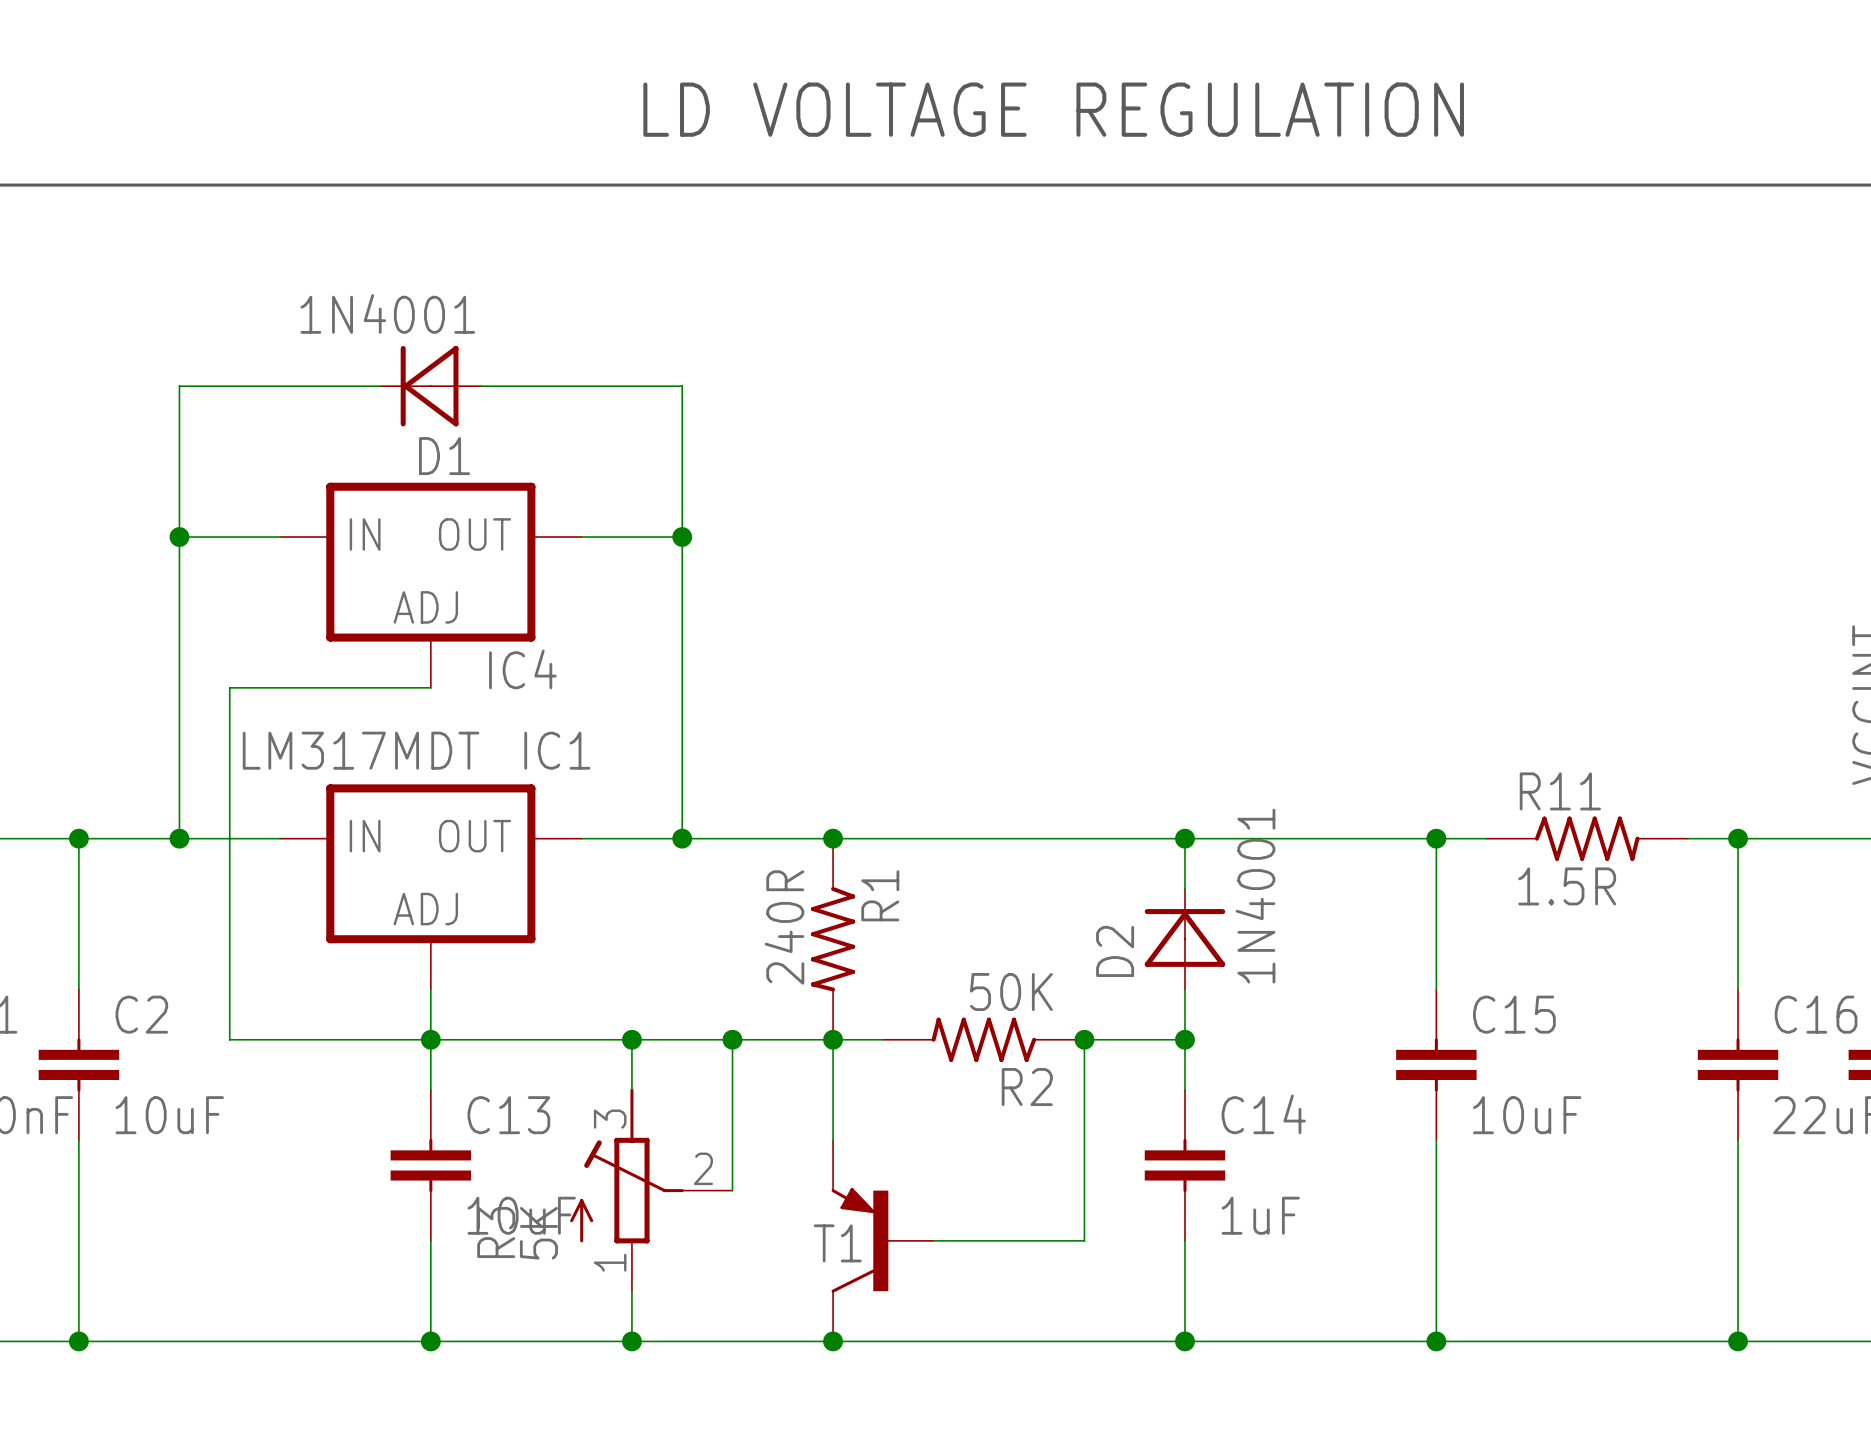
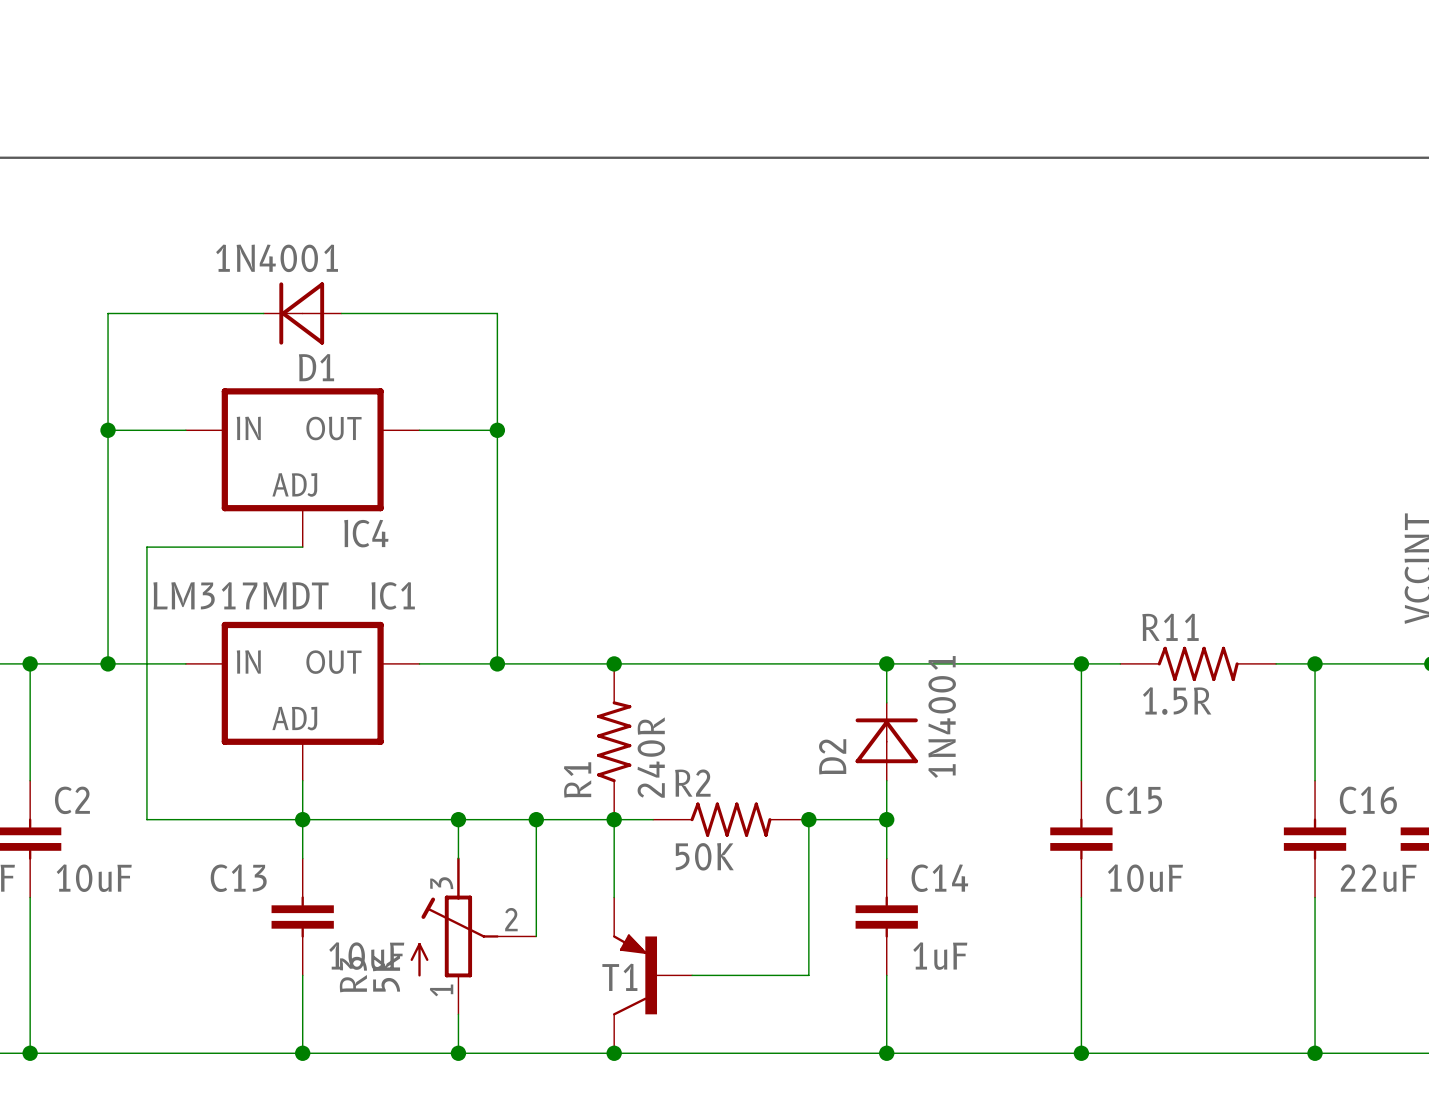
text: LD VOLTAGE REGULATION (1053, 109) -> none
R1 rotation: 0° (833, 939) -> 180° (614, 741)
R2 rotation: 0° (983, 1039) -> 180° (730, 819)
C13 name position: C13 (508, 1115) -> C13 (238, 878)

